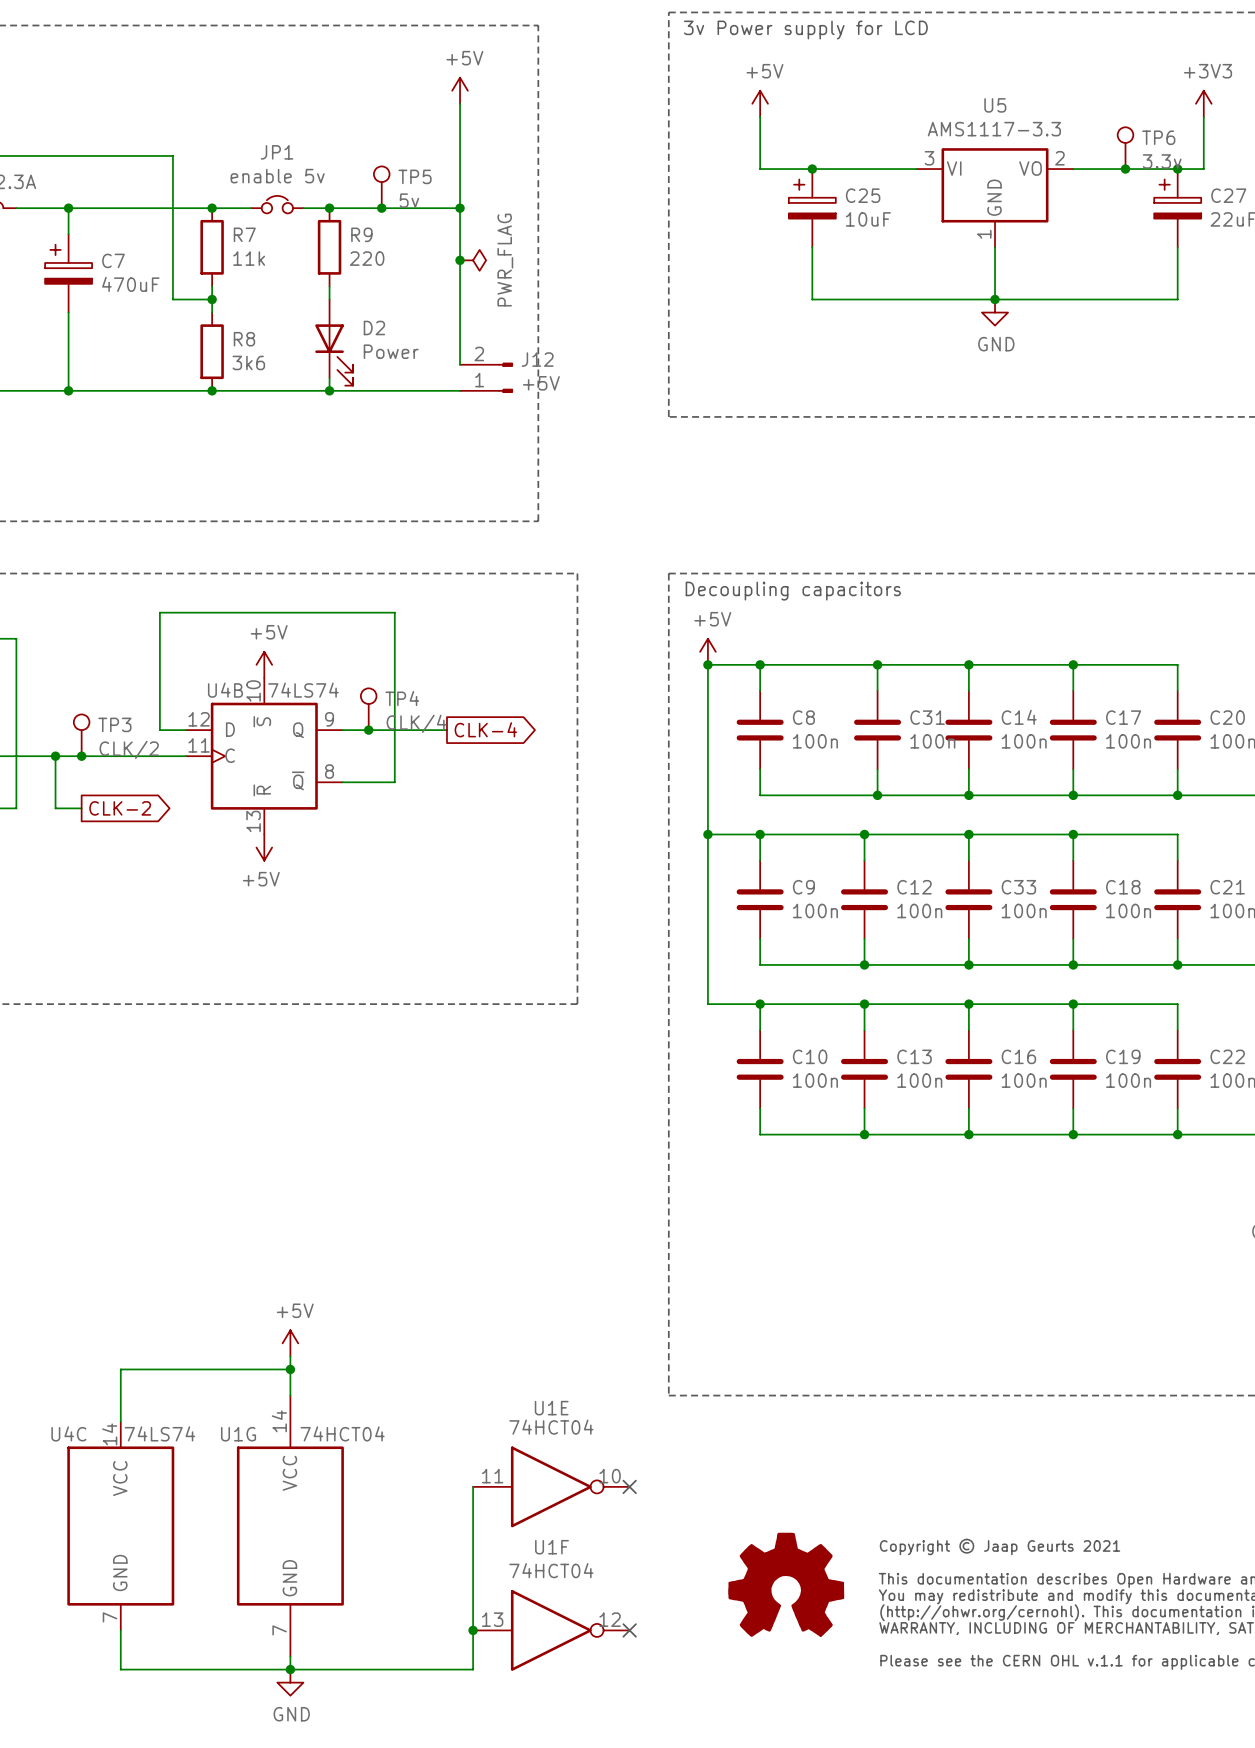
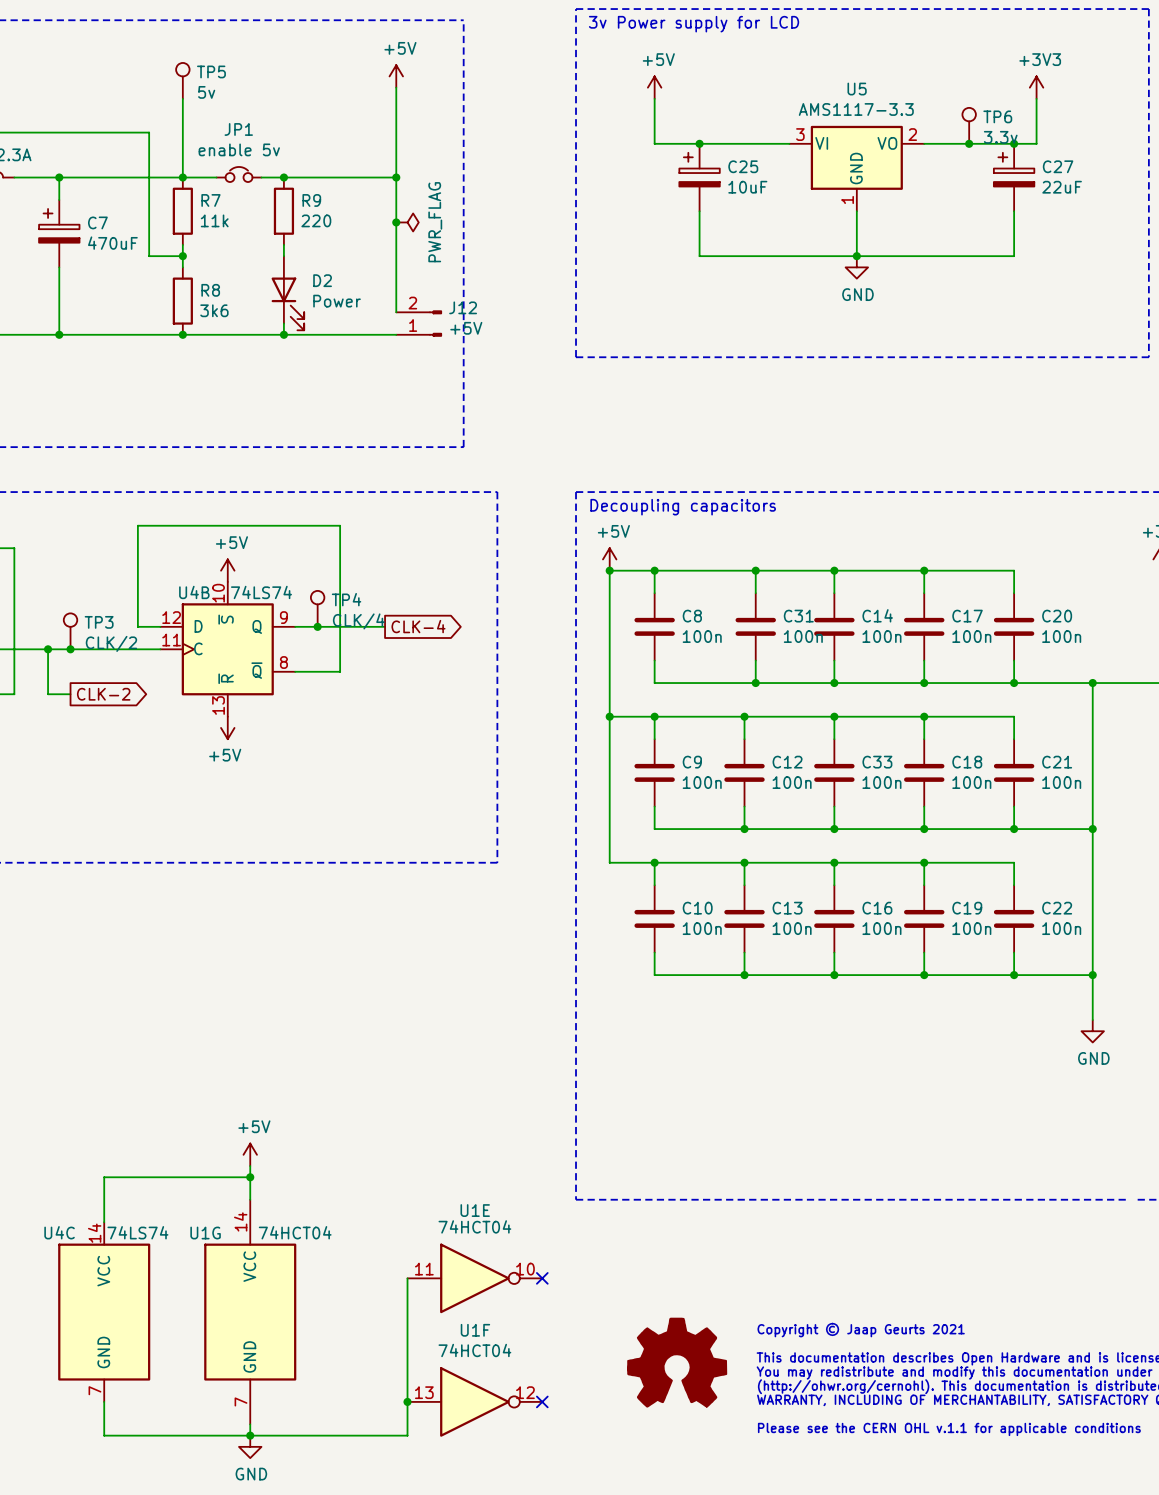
wire: none -> (182, 98) (182, 177)
TP5 position: (381, 187) -> (182, 80)
junction: (381, 208) -> none

